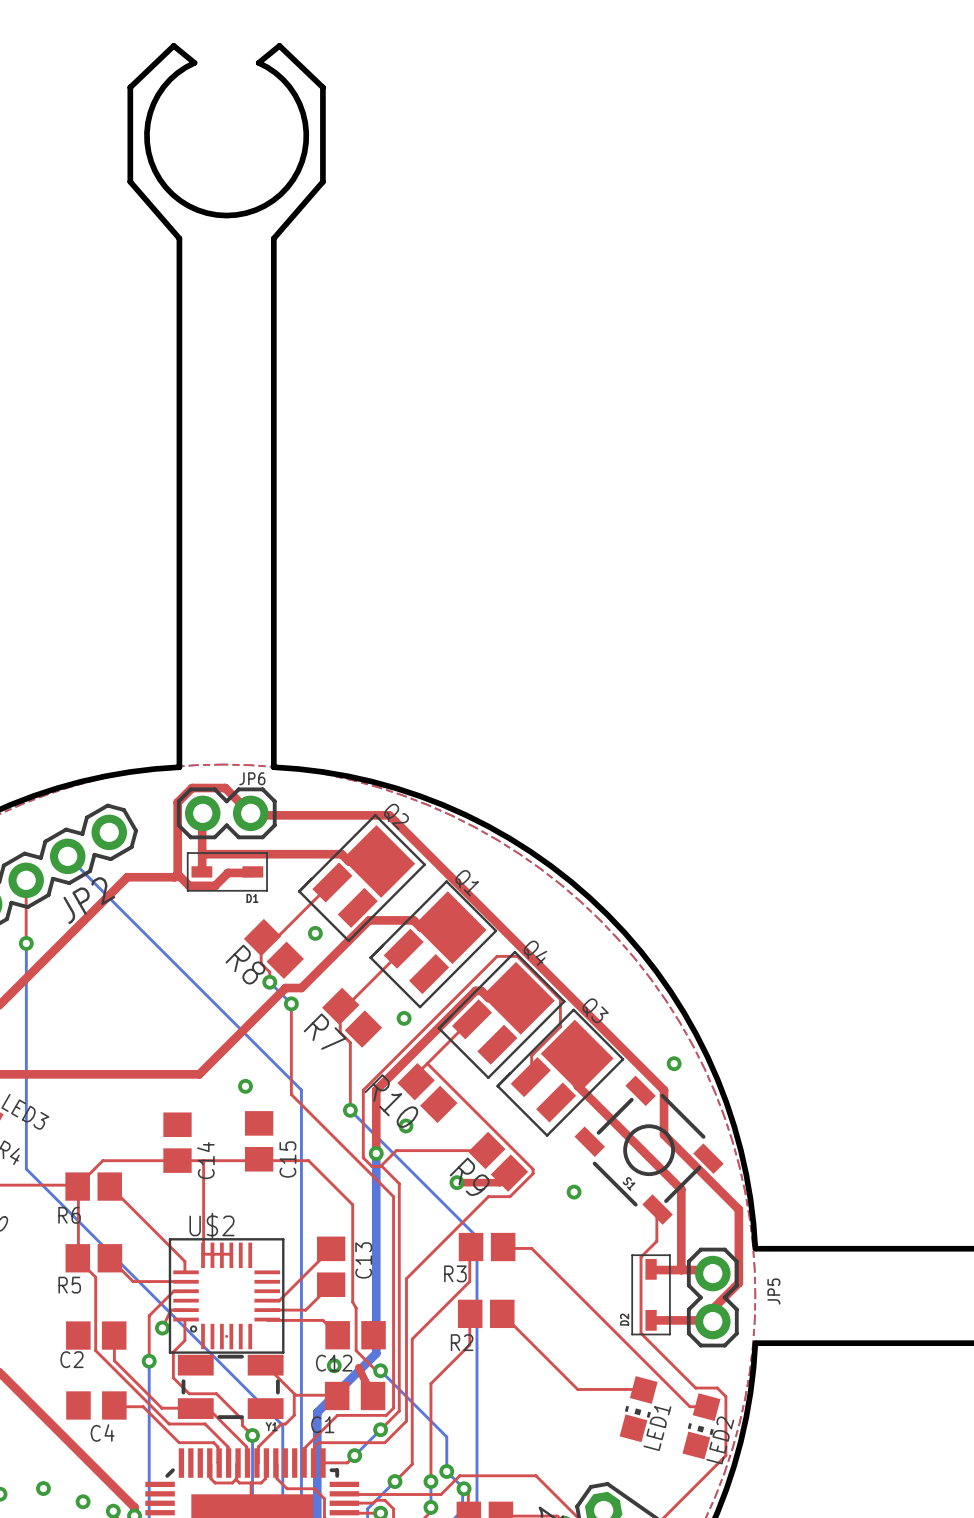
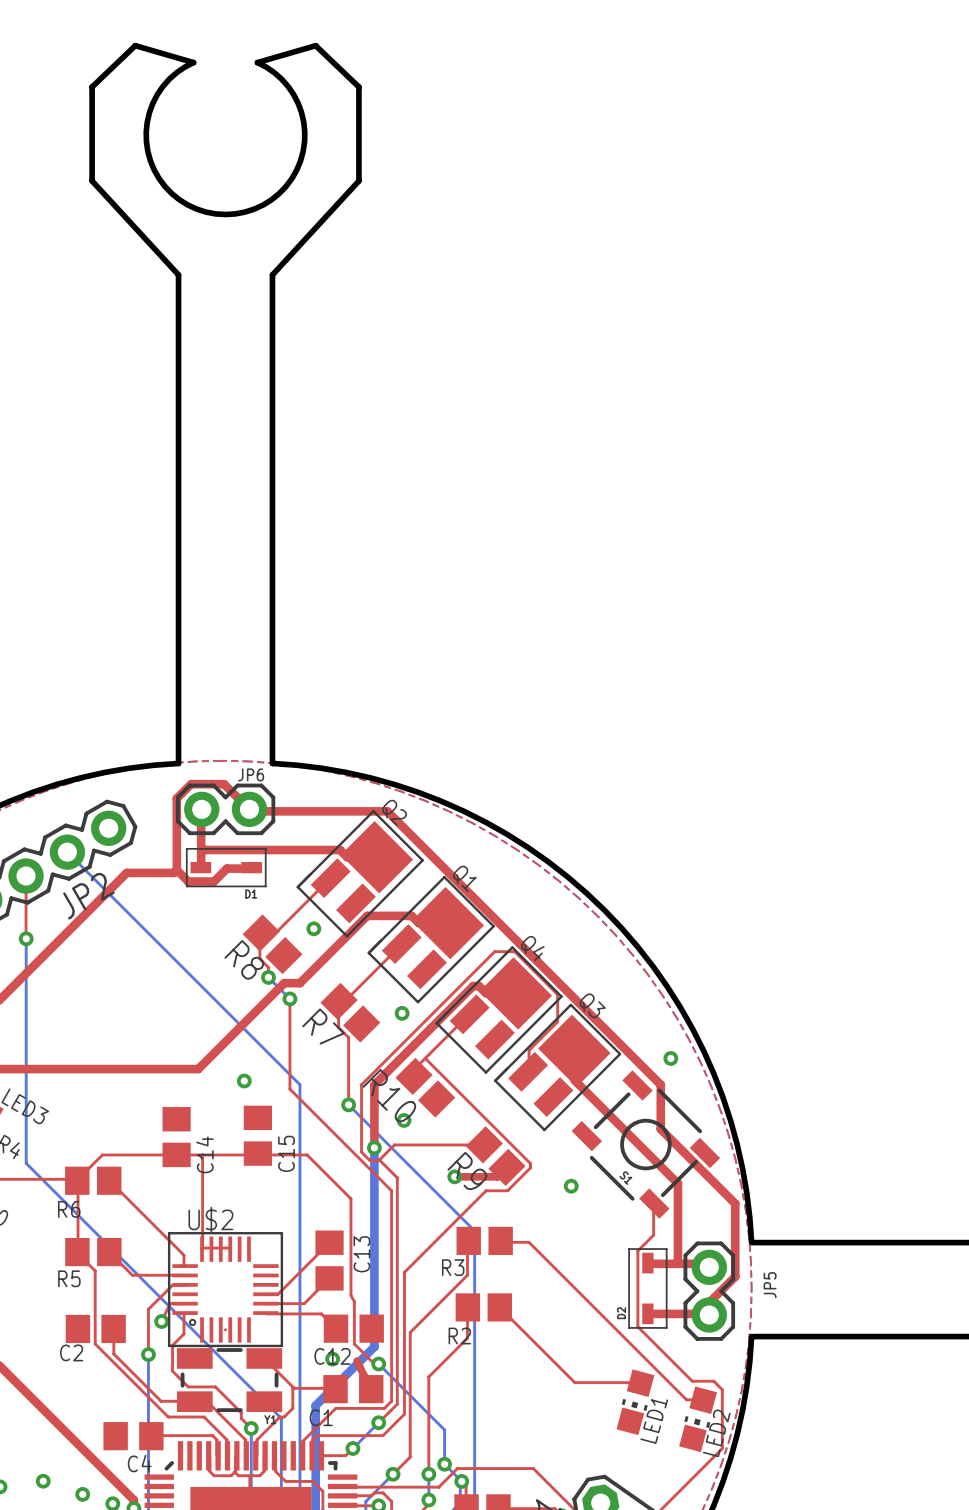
board edge: (194, 62) (173, 45) (130, 87) (130, 181) (179, 238) (179, 276) -> (193, 62) (135, 45) (92, 87) (92, 180) (178, 274)
board edge: (258, 62) (279, 45) (322, 87) (322, 181) (273, 238) (273, 276) -> (257, 62) (315, 45) (358, 87) (358, 180) (272, 274)
C4 position: (96, 1405) -> (133, 1436)
top track: (114, 1405) (143, 1406) (179, 1442) -> (151, 1436) (178, 1435)

